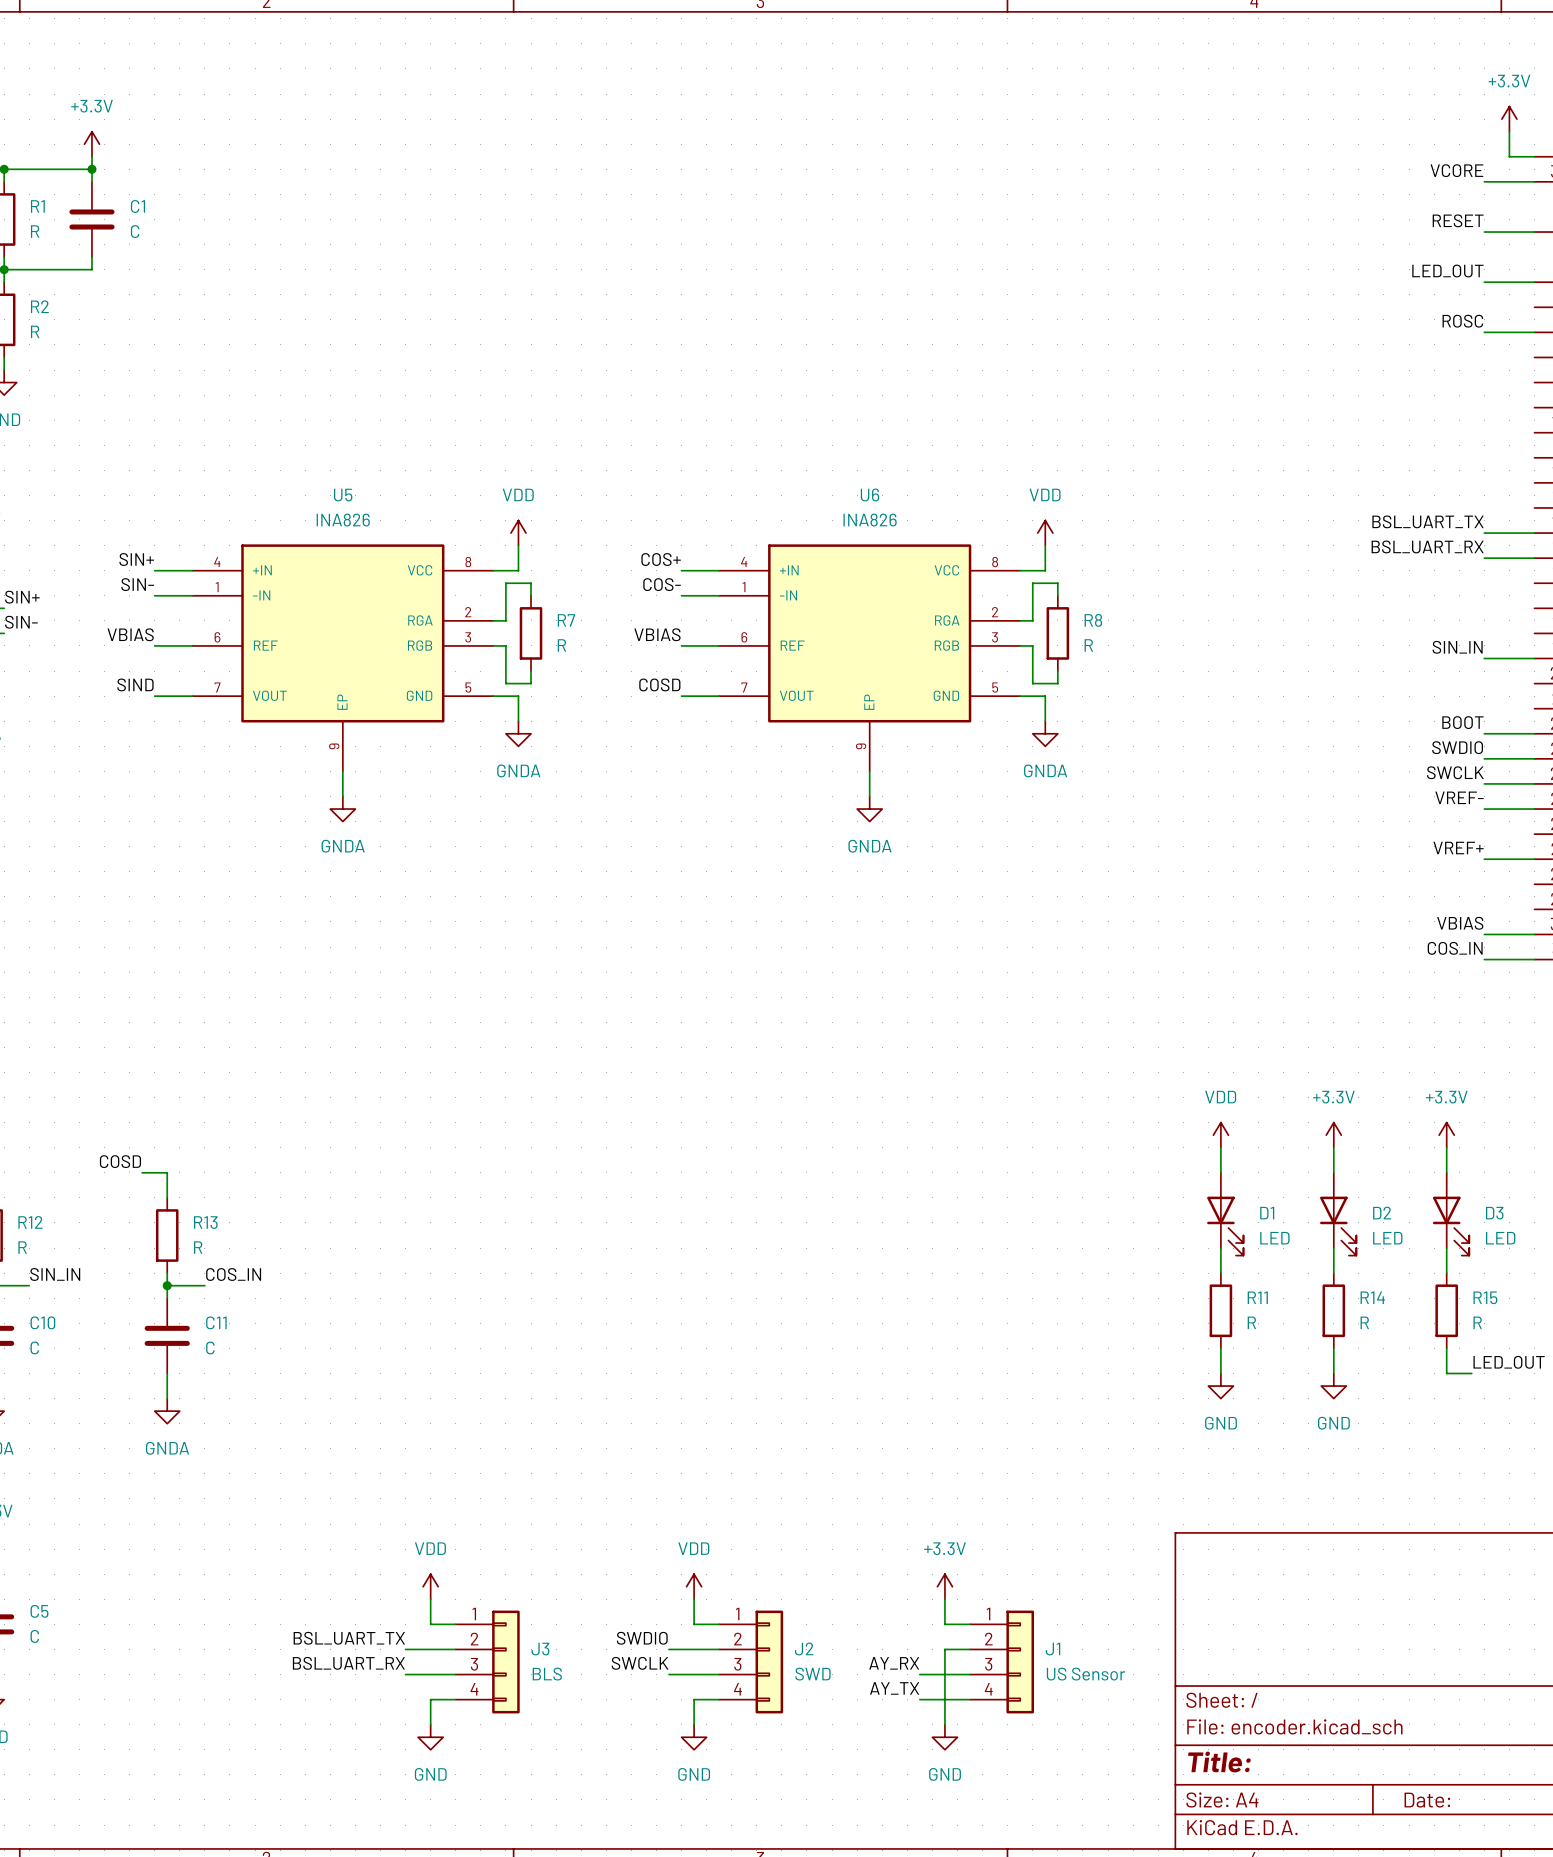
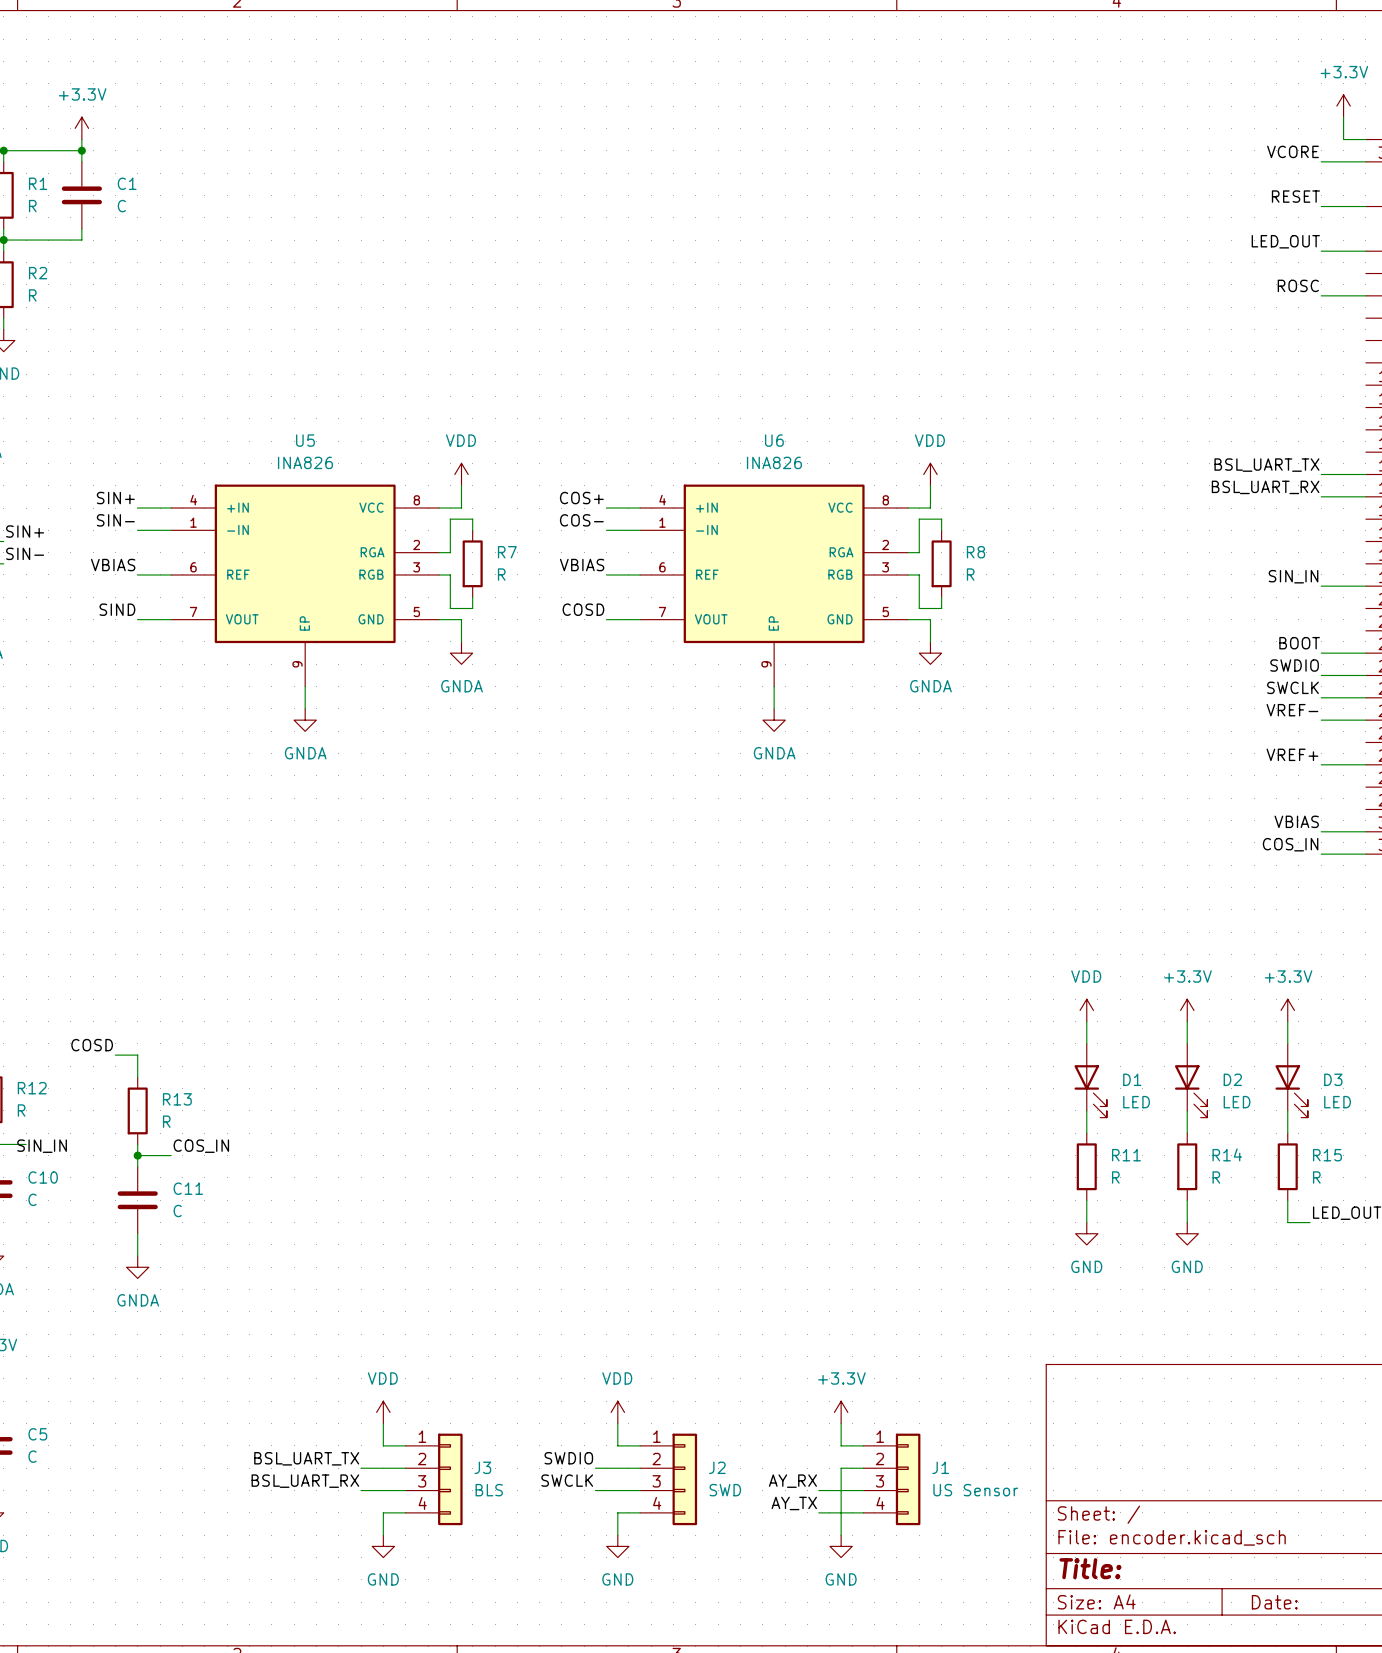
label position: COSD (120, 1161) -> COSD (92, 1045)
wire: (142, 1172) (167, 1172) (167, 1197) -> (115, 1055) (137, 1055) (137, 1077)
R13 position: (167, 1235) -> (137, 1110)
wire: (167, 1273) (167, 1298) -> (137, 1144) (137, 1166)
label position: SIN_IN (55, 1274) -> SIN_IN (42, 1146)
label position: COS_IN (233, 1274) -> COS_IN (201, 1146)
wire: (167, 1285) (204, 1285) -> (137, 1155) (171, 1155)
junction position: (167, 1285) -> (137, 1155)
C11 position: (167, 1335) -> (137, 1200)
wire: (167, 1373) (167, 1398) -> (137, 1233) (137, 1256)
power symbol position: GNDA (167, 1411) -> GNDA (137, 1267)

